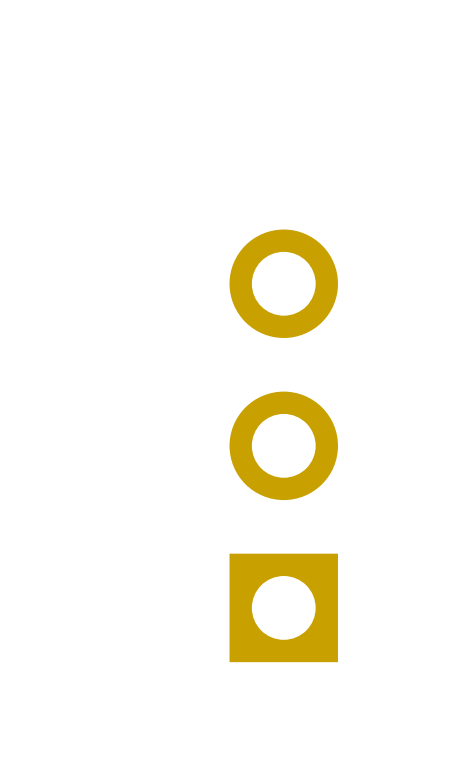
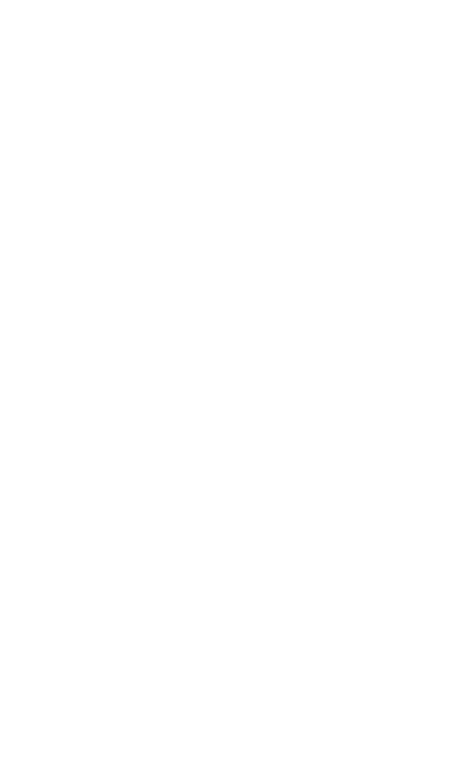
part: (283, 445) -> none

